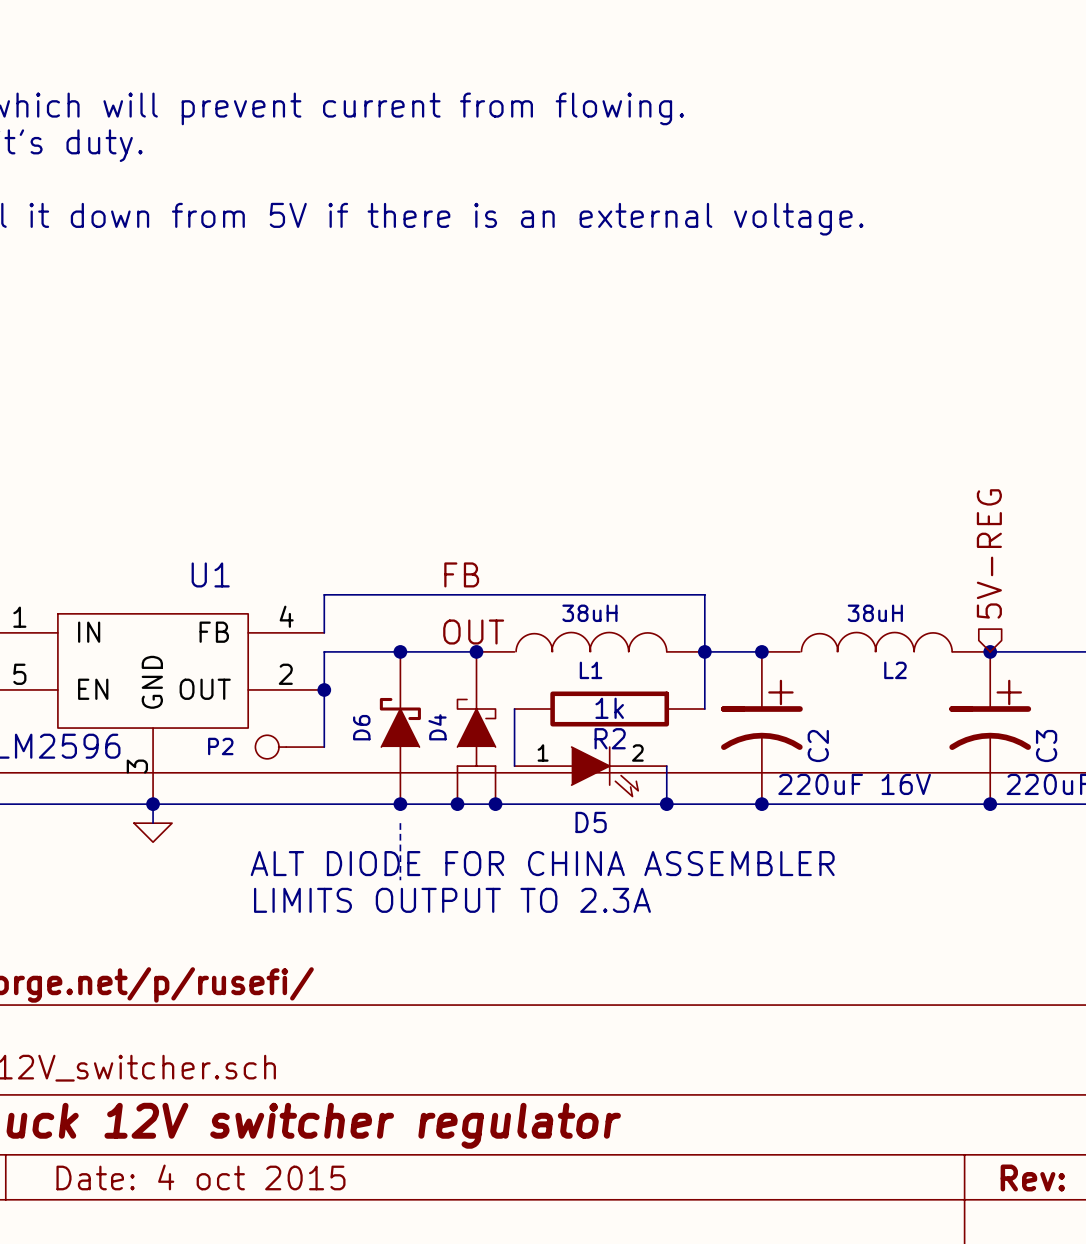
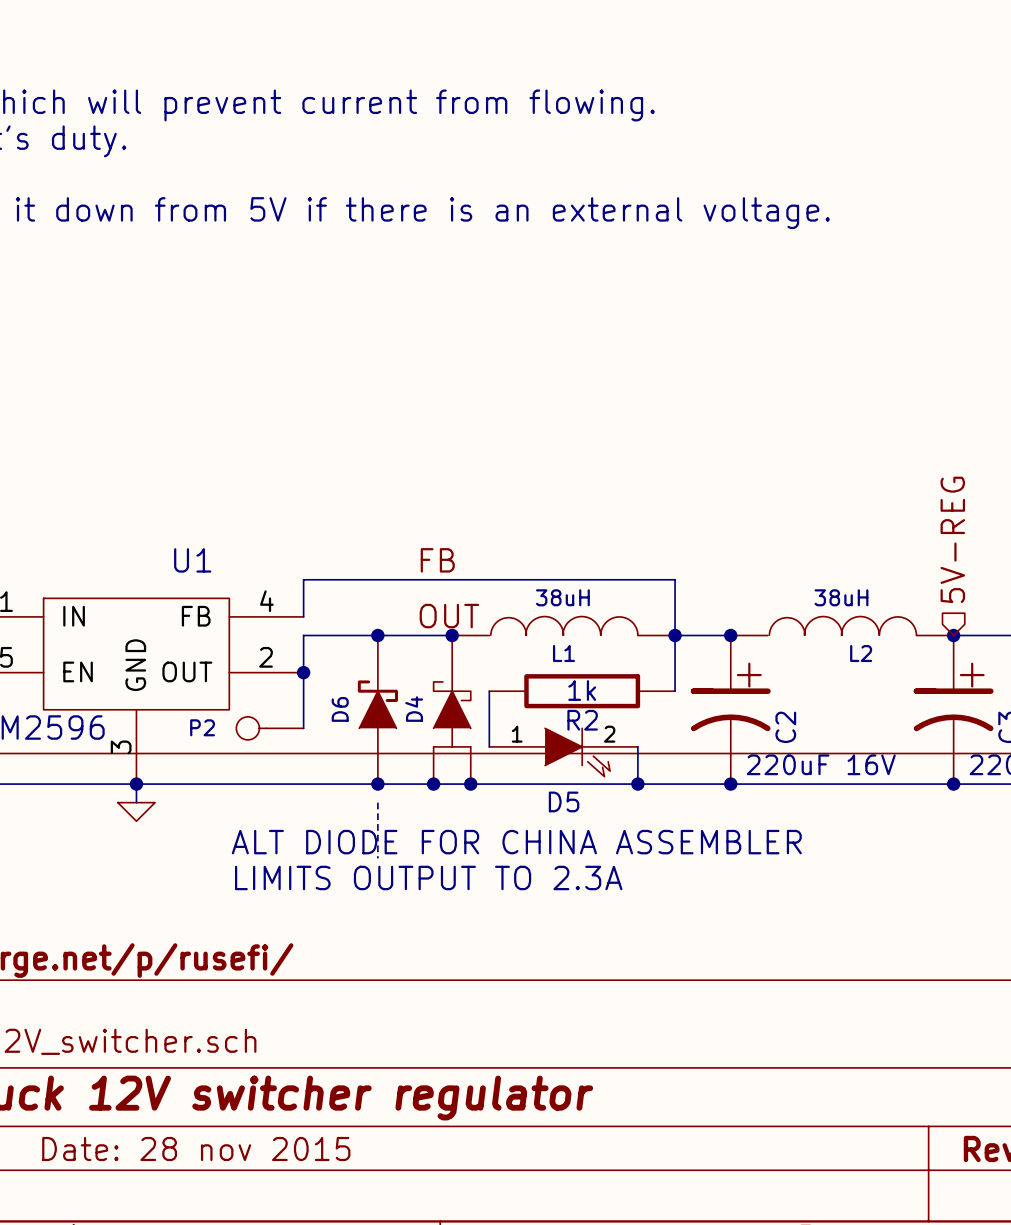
title block: Date: 4 oct 2015 (200, 1177) -> Date: 28 nov 2015 (196, 1148)

